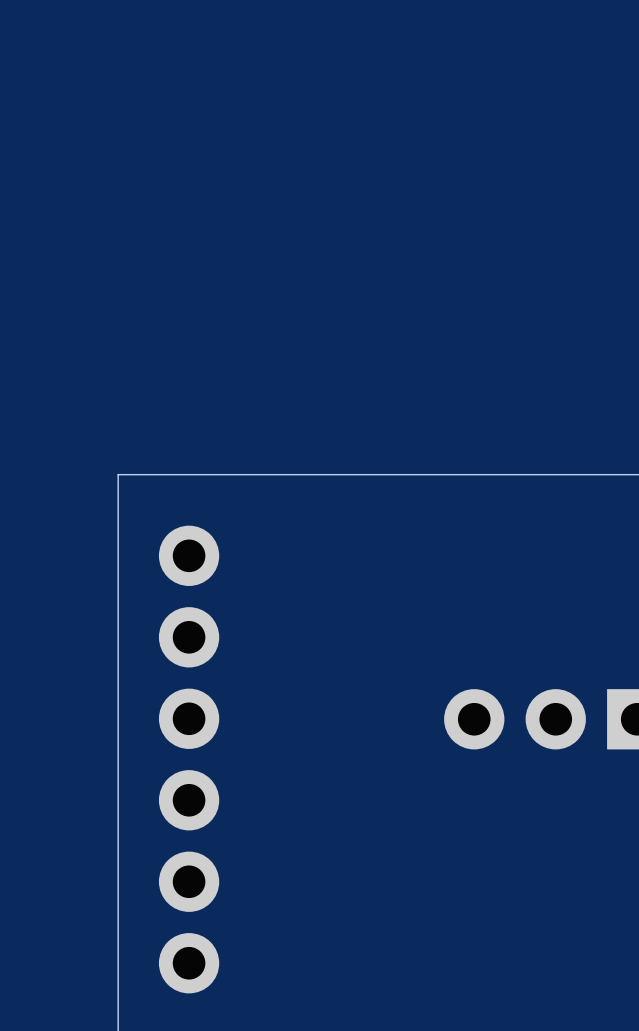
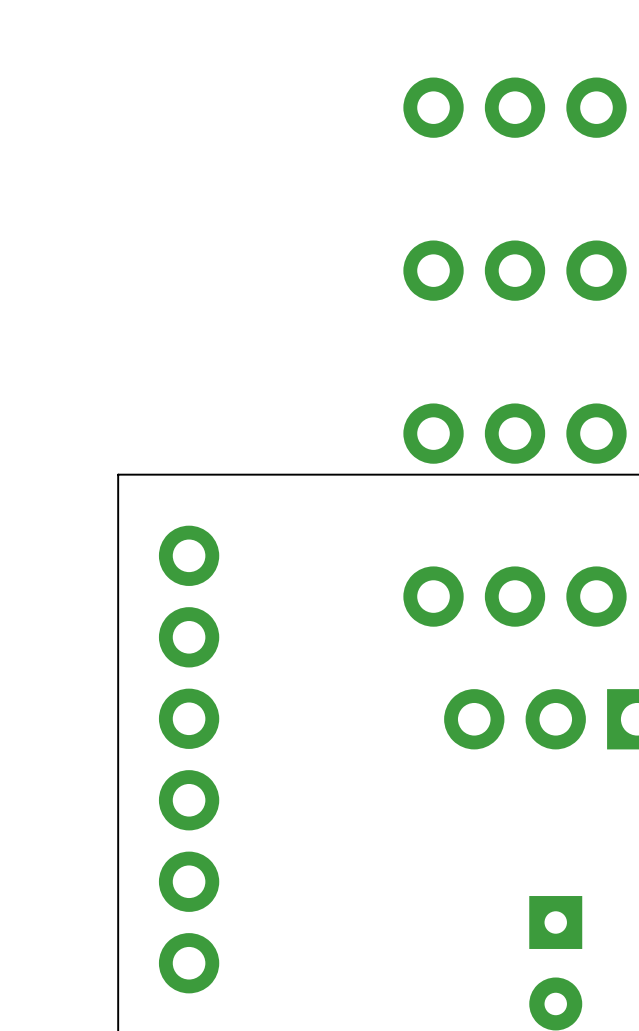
part: none -> (515, 107)
part: none -> (515, 270)
part: none -> (515, 433)
part: none -> (515, 596)
part: none -> (555, 963)

